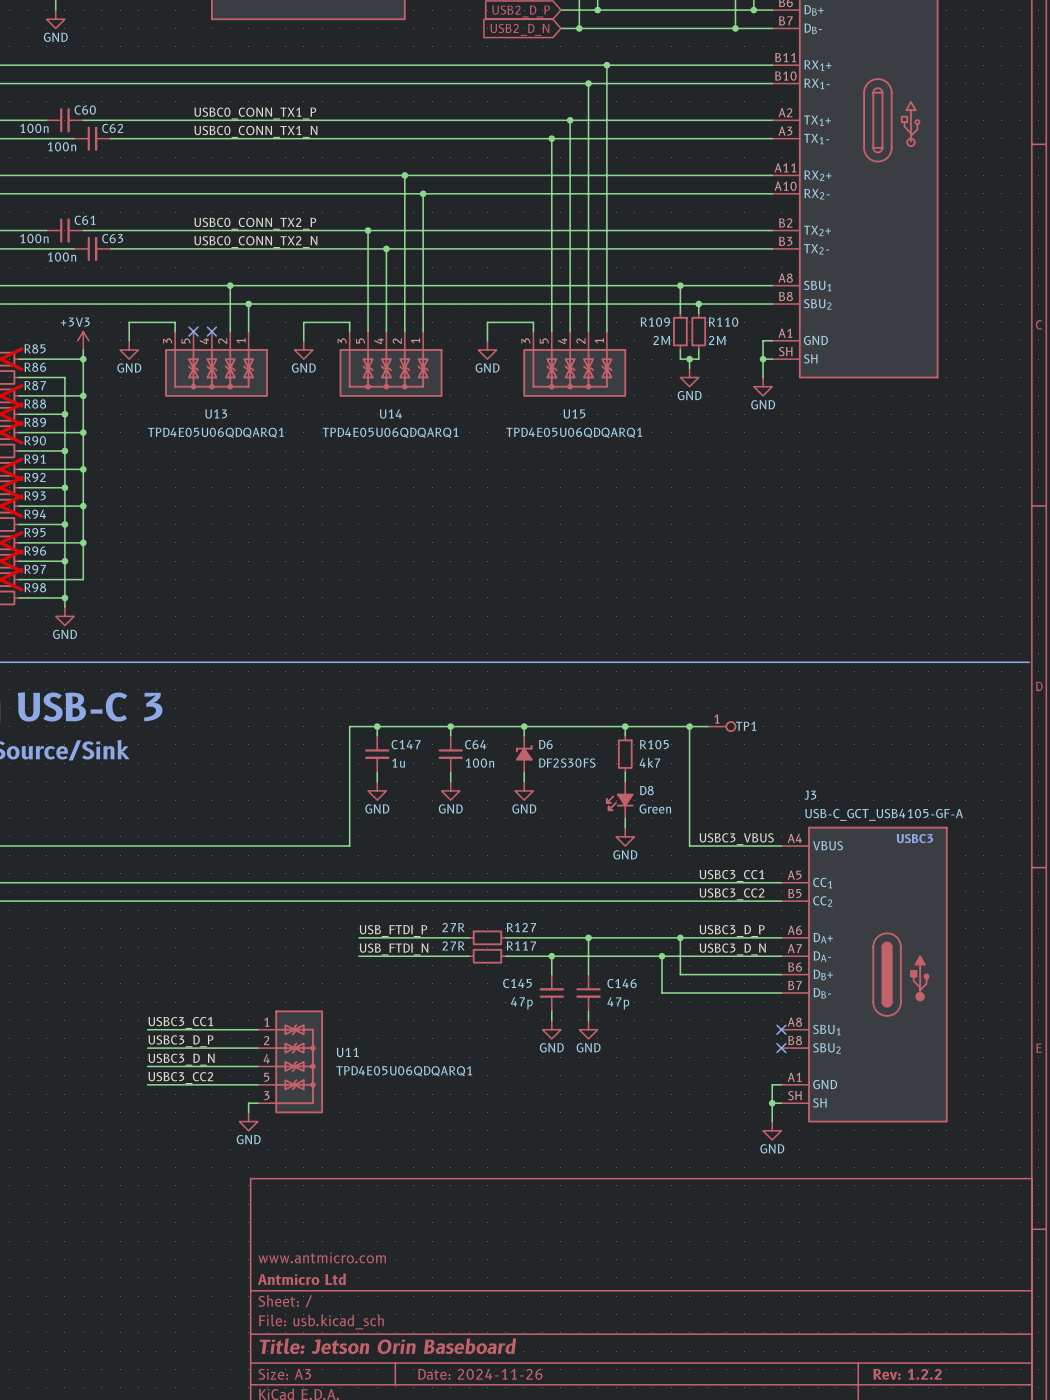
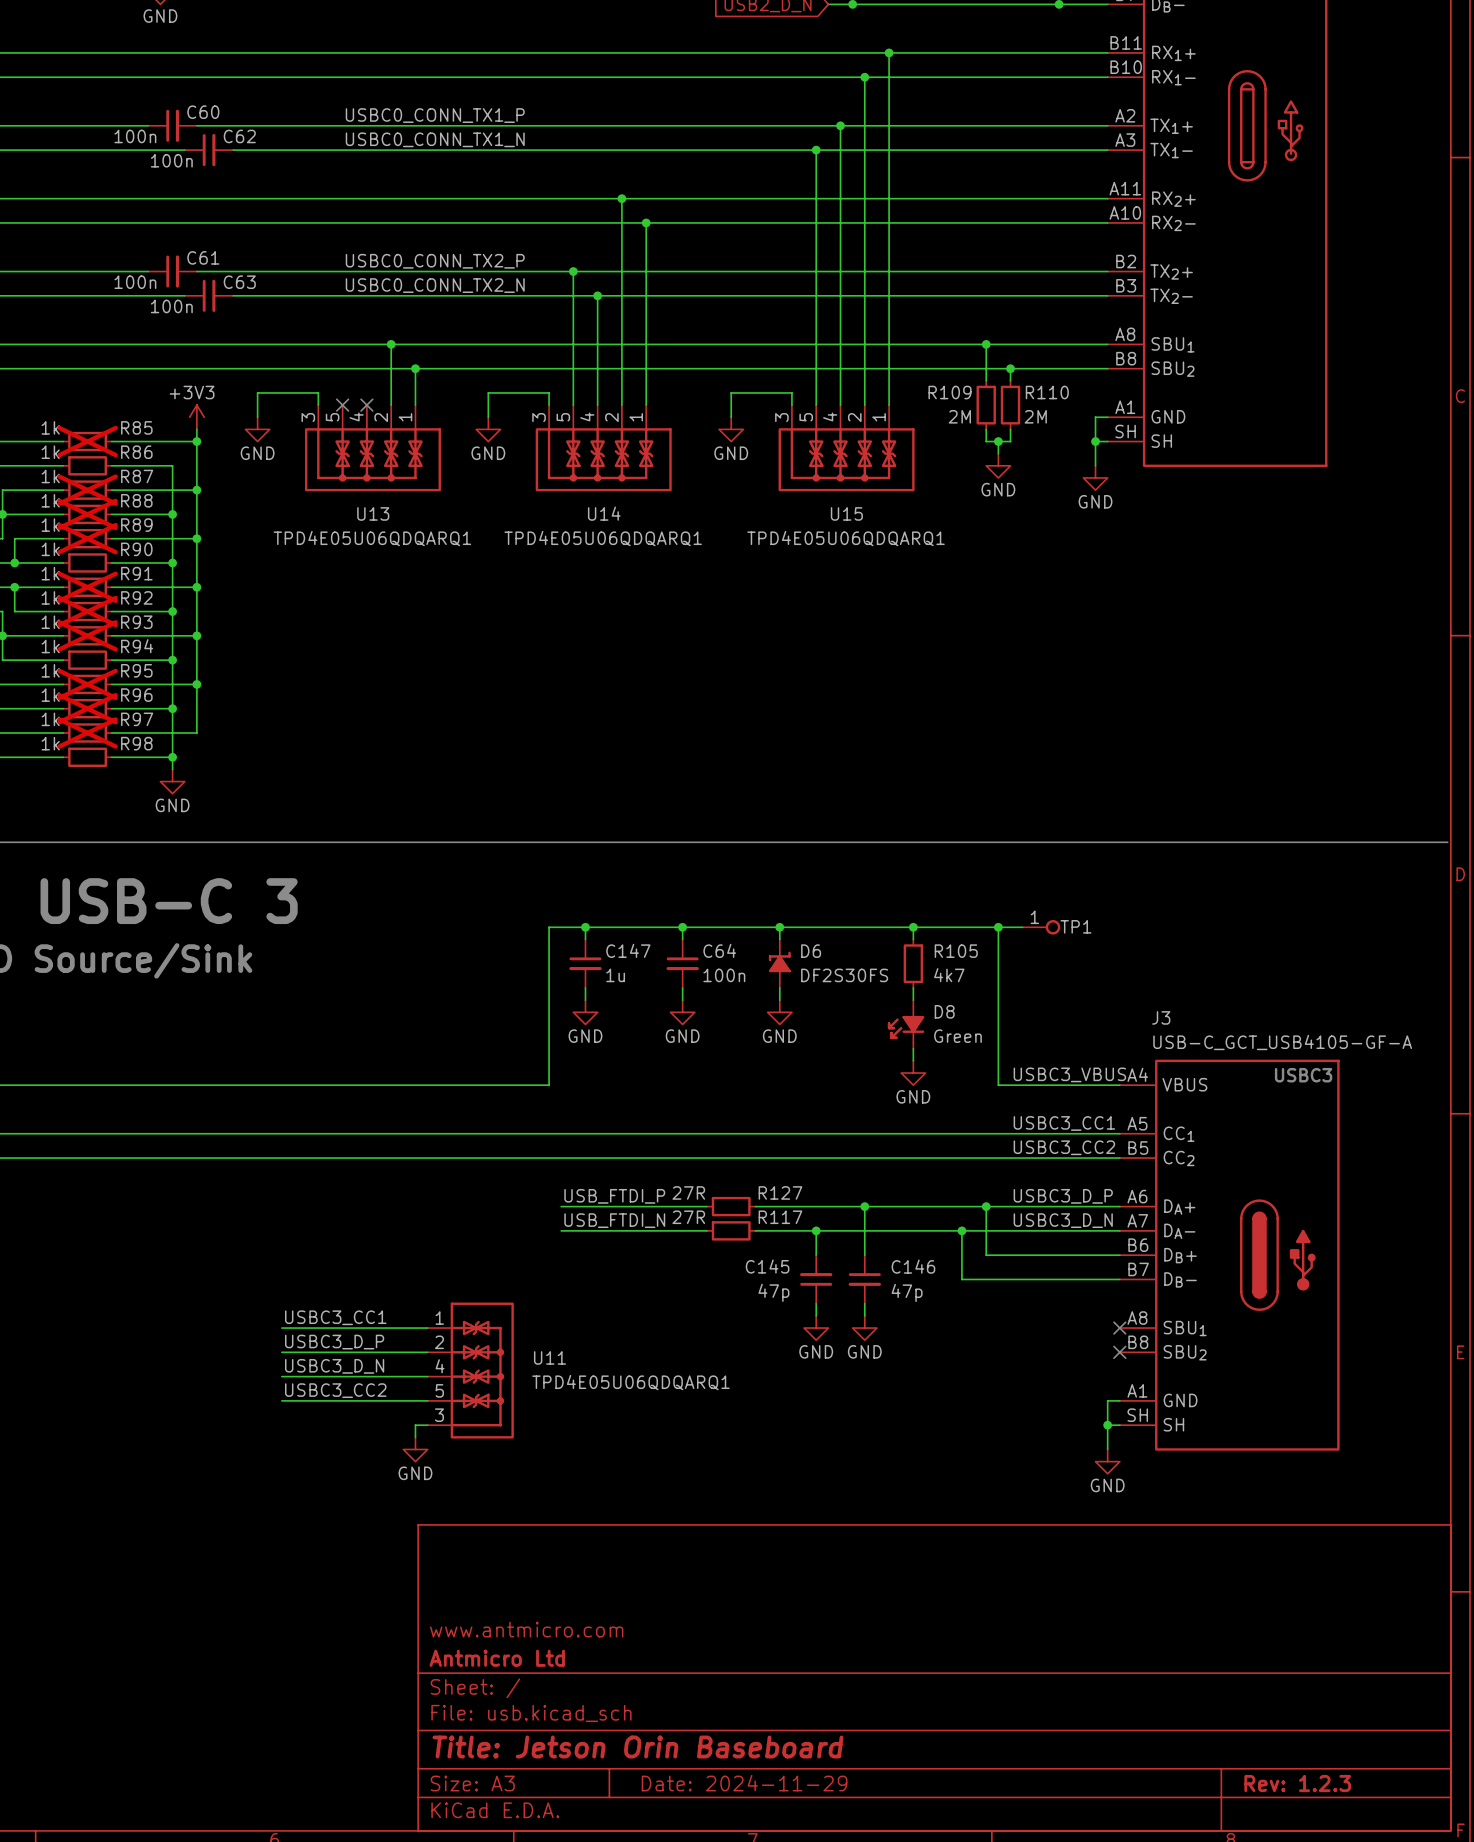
title block: Date: 2024-11-26 (480, 1374) -> Date: 2024-11-29 (744, 1783)
title block: Rev: 1.2.2 (907, 1374) -> Rev: 1.2.3 (1297, 1783)

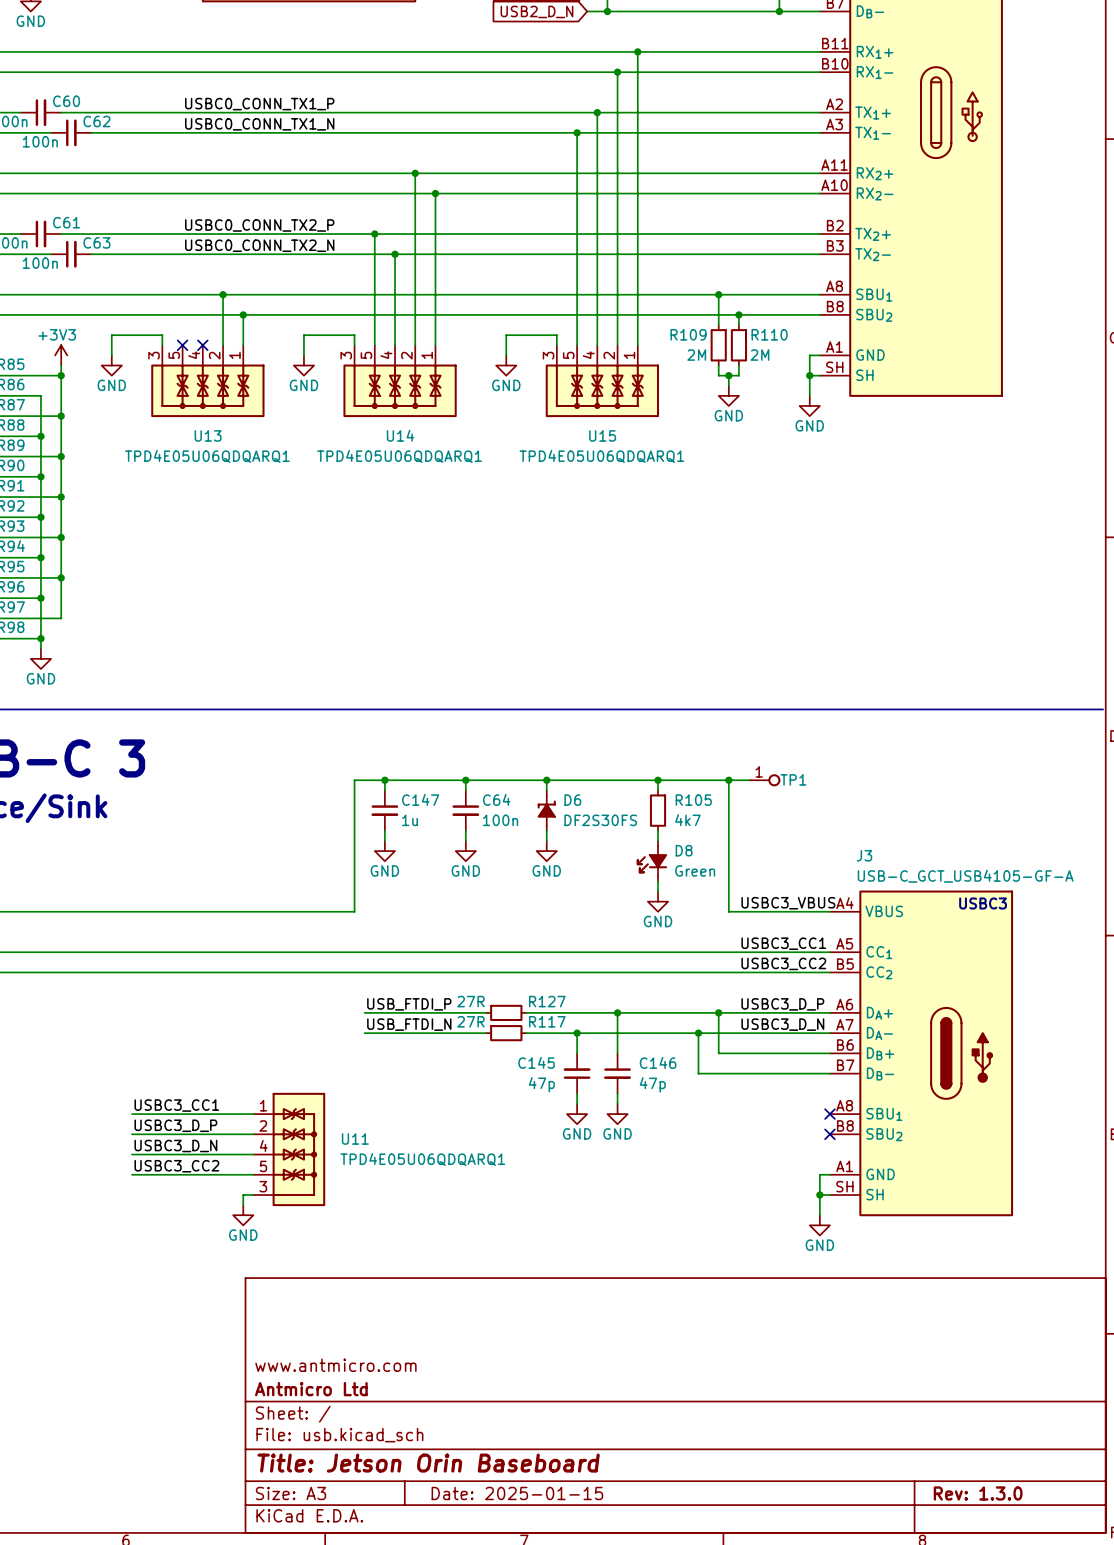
title block: Date: 2024-11-29 (744, 1783) -> Date: 2025-01-15 (517, 1493)
title block: Rev: 1.2.3 (1297, 1783) -> Rev: 1.3.0 (978, 1493)

